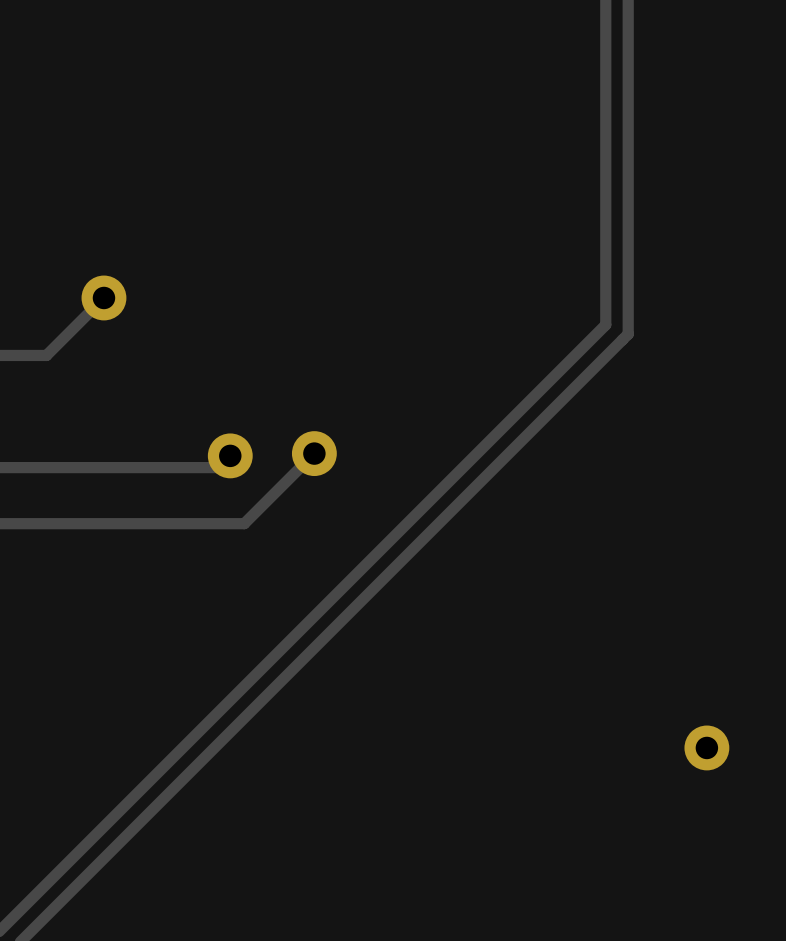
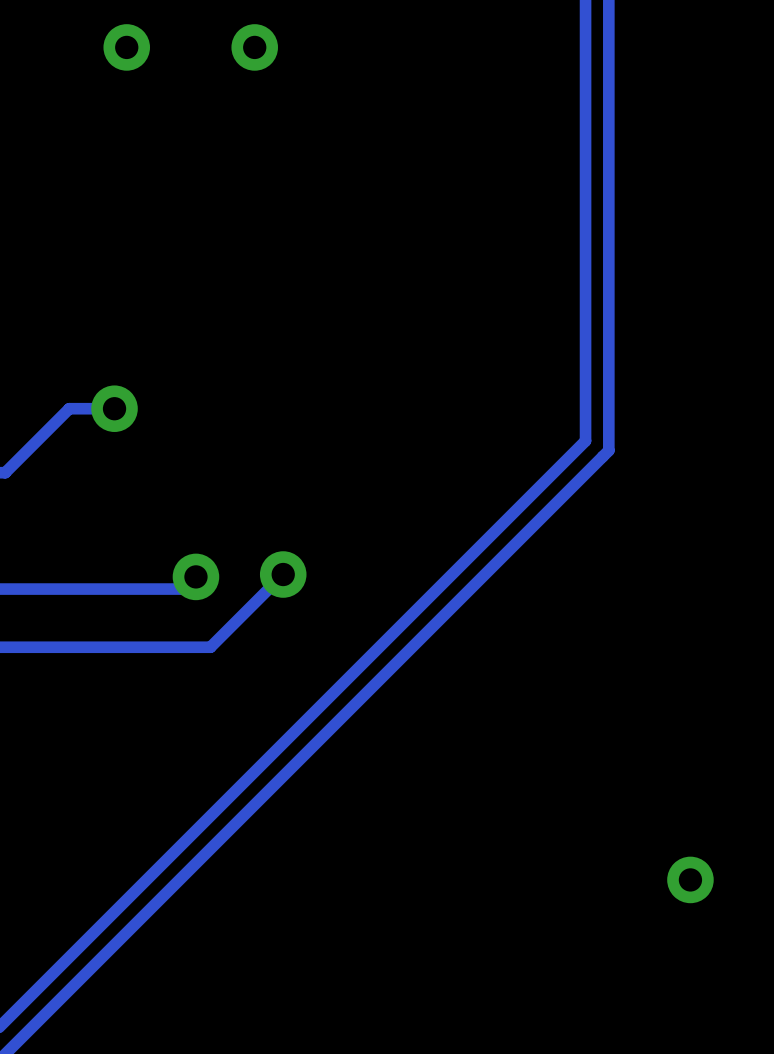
track: none -> (114, 408) (69, 408) (64, 413)
via position: (103, 297) -> (114, 408)

